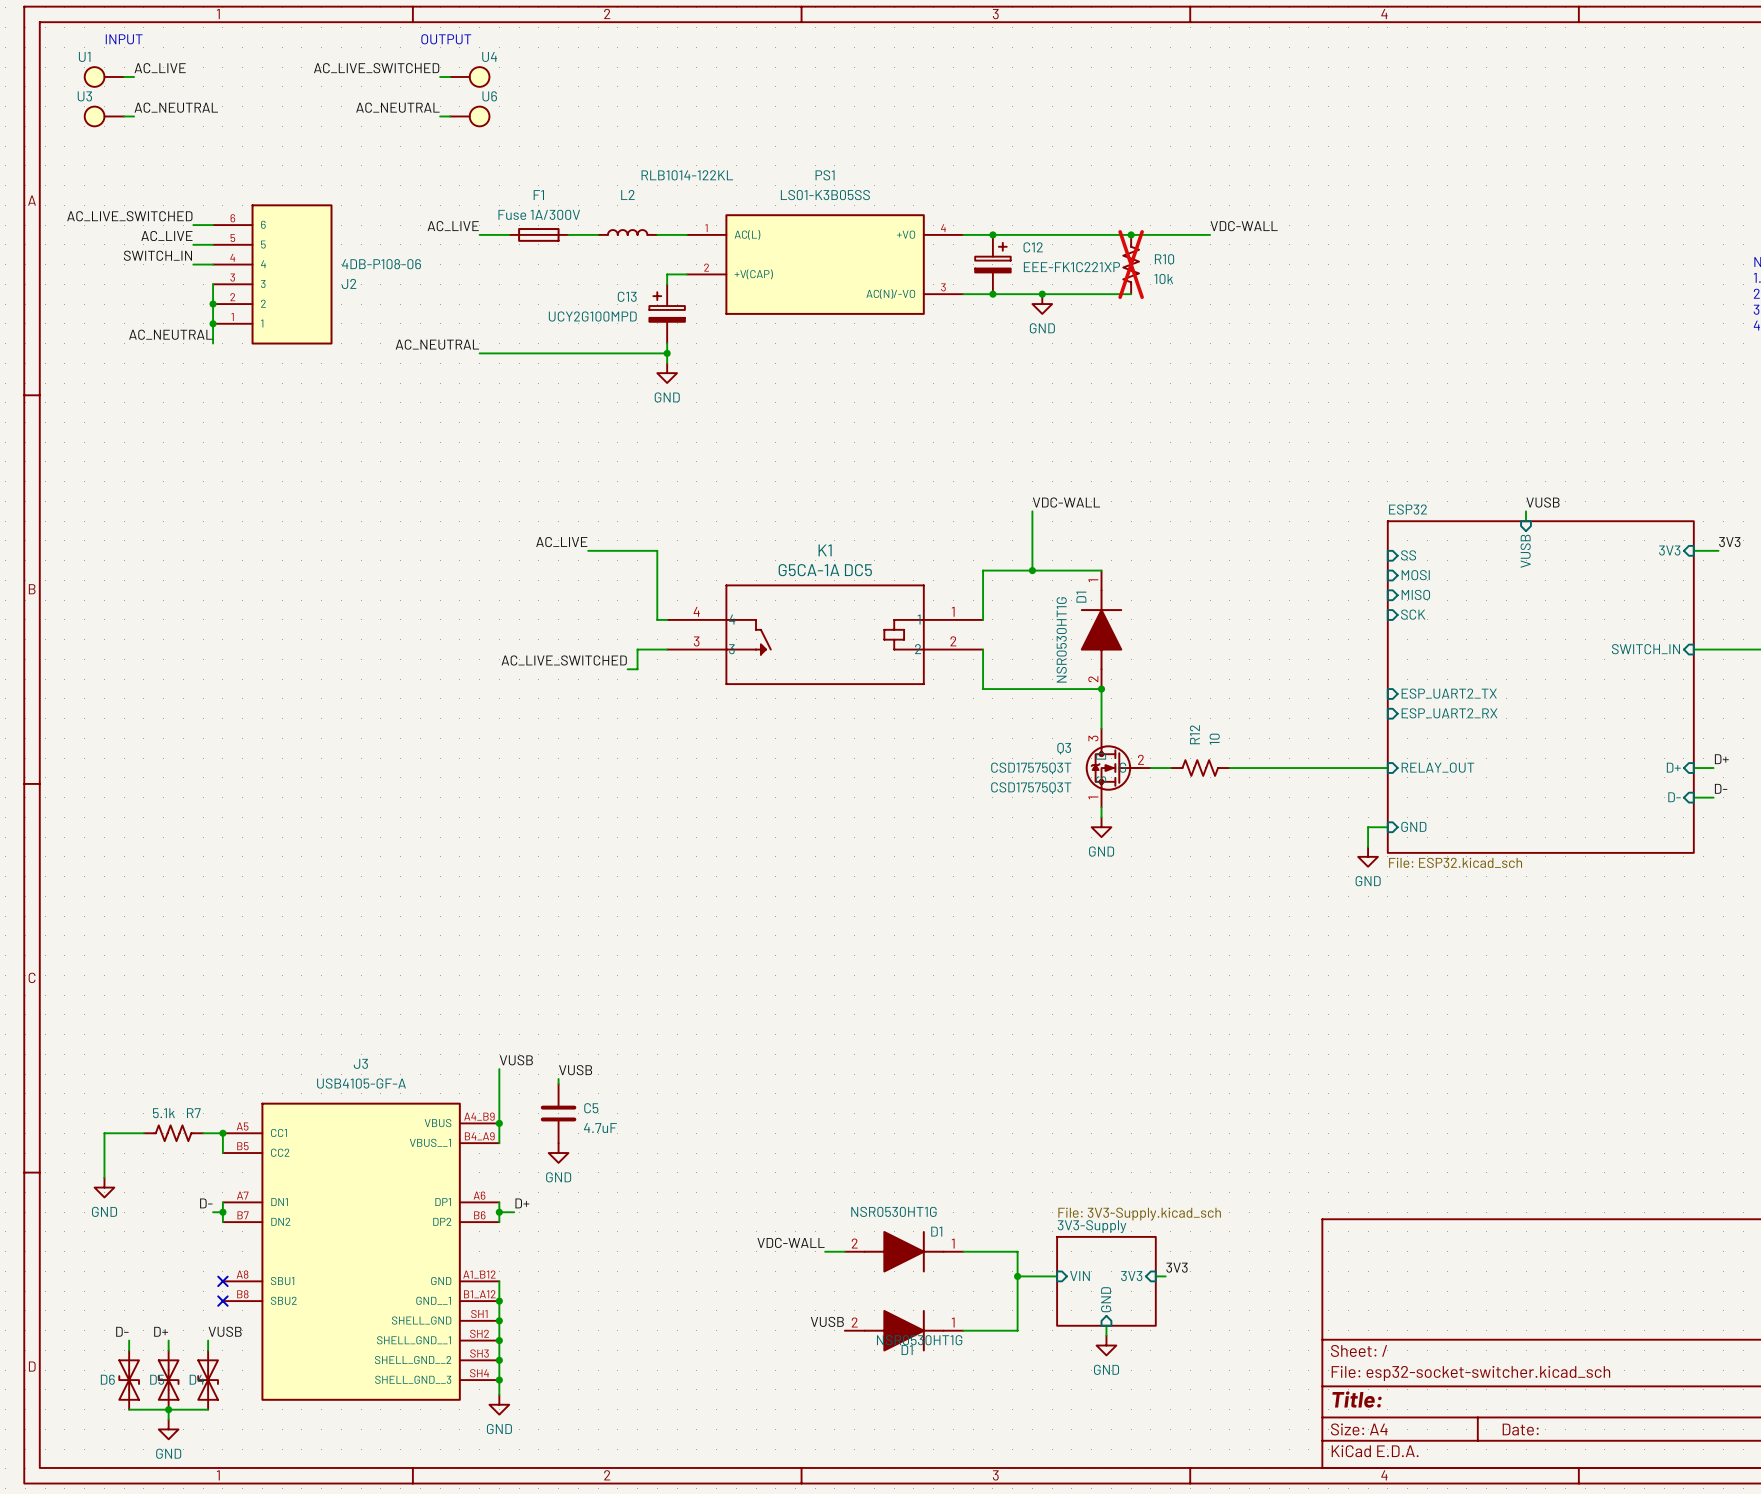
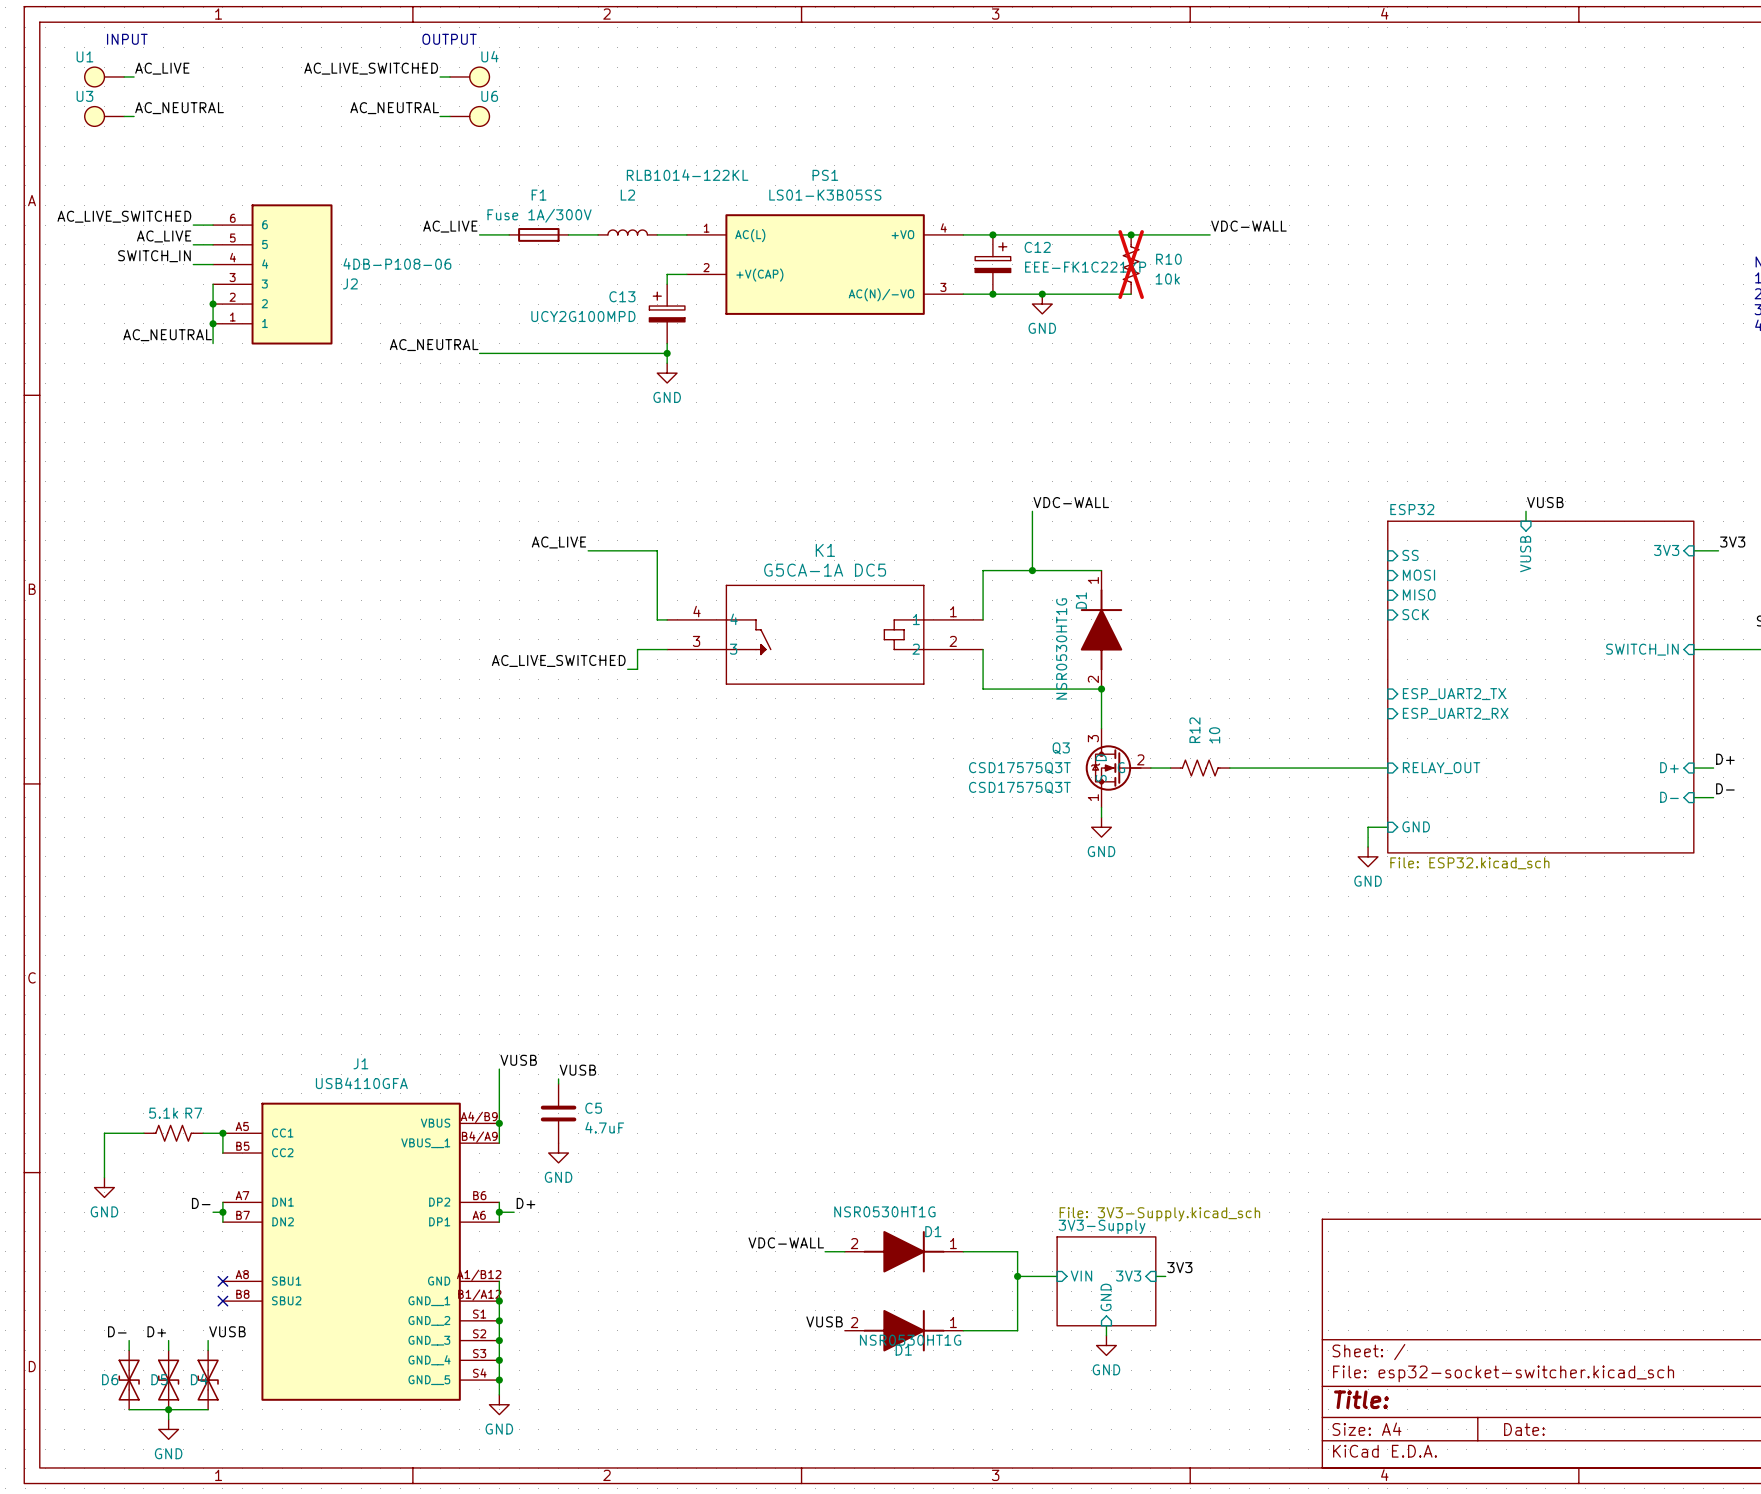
J3 name: J3 (360, 1063) -> J1 (360, 1063)
J3 value: USB4105-GF-A (361, 1083) -> USB4110GFA (361, 1083)
J3 symbol: [222, 1102, 500, 1401] -> [222, 1102, 500, 1401]

